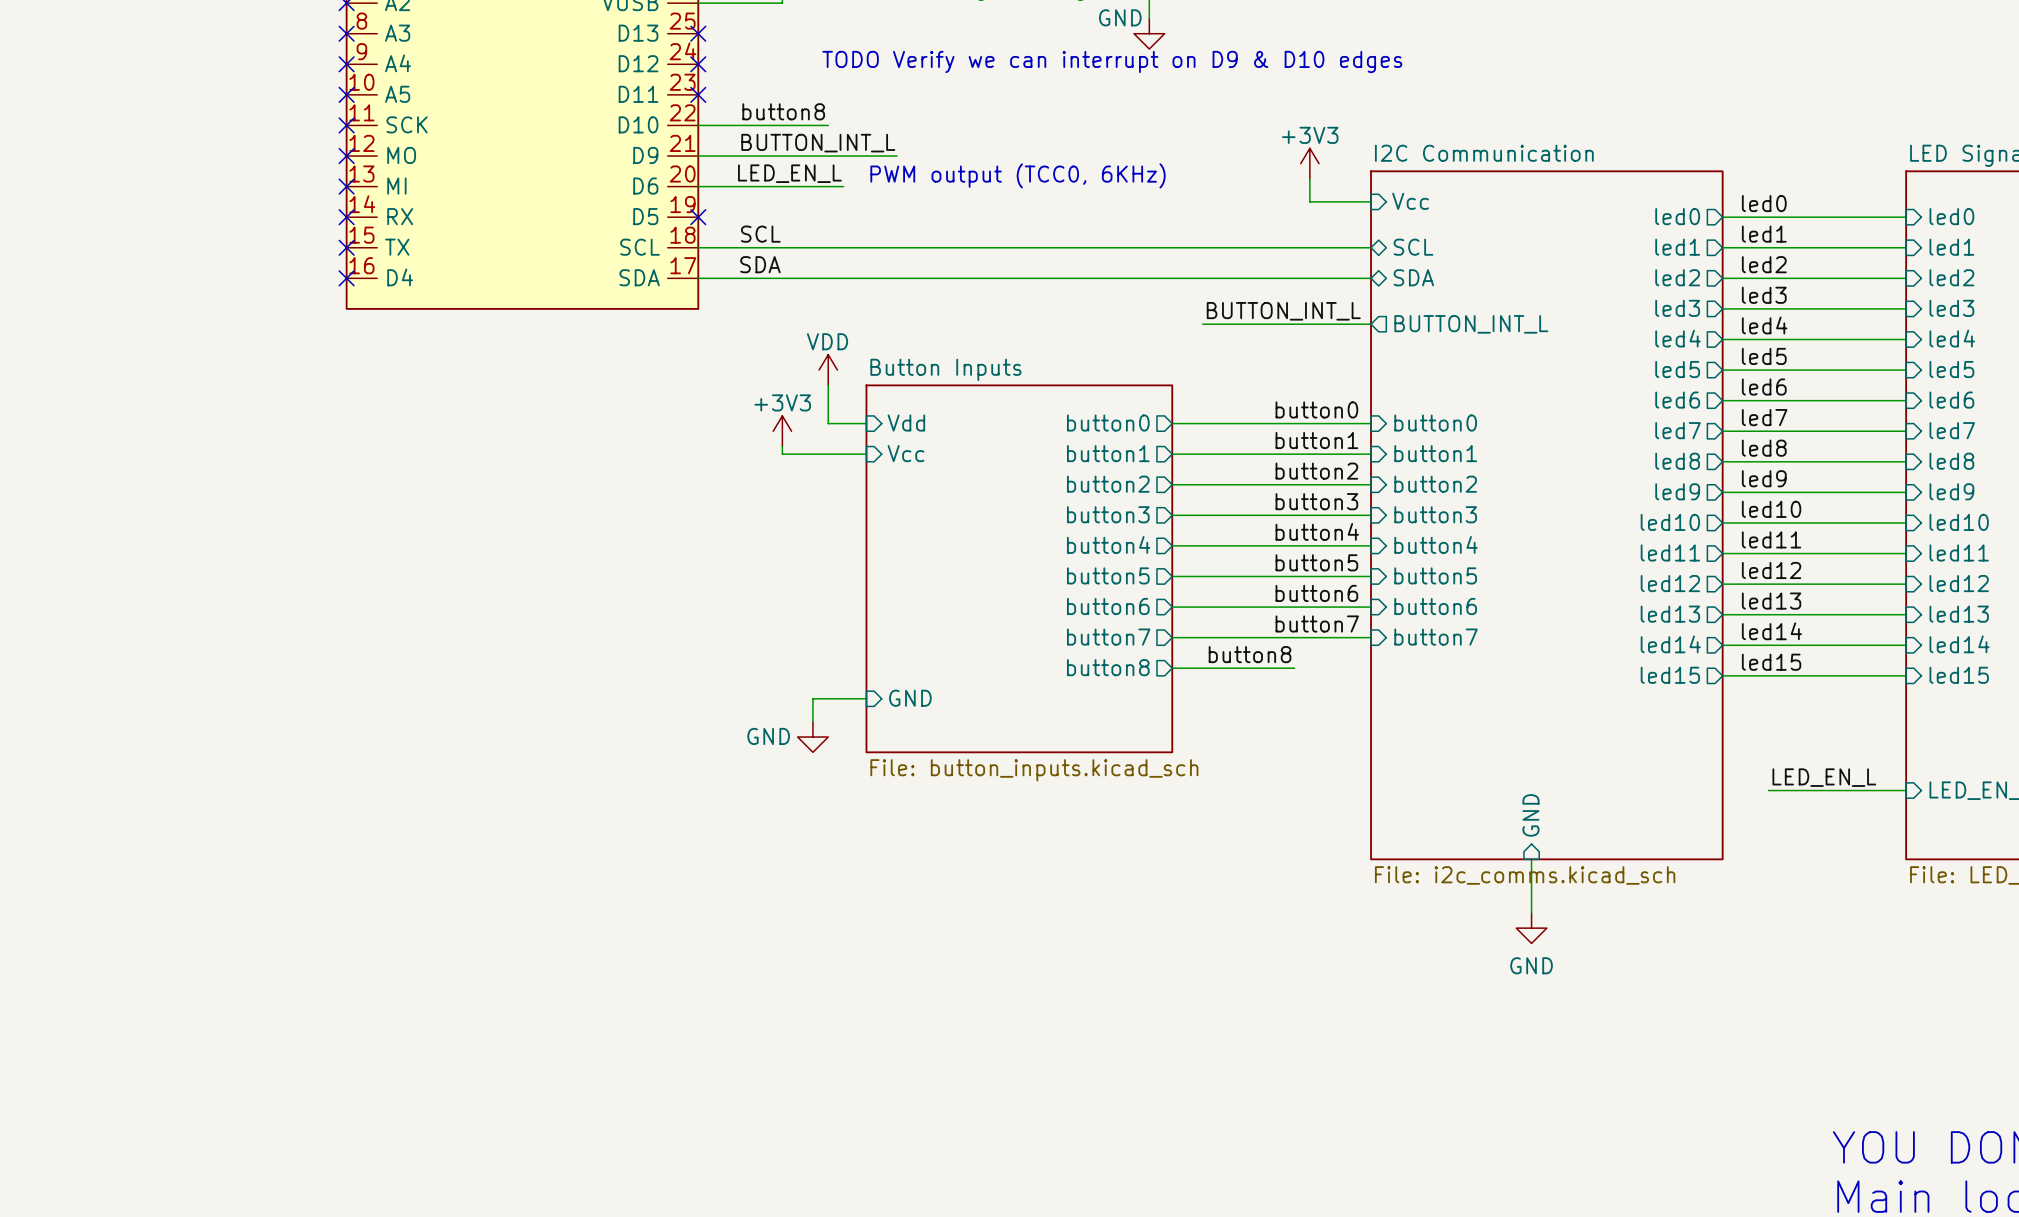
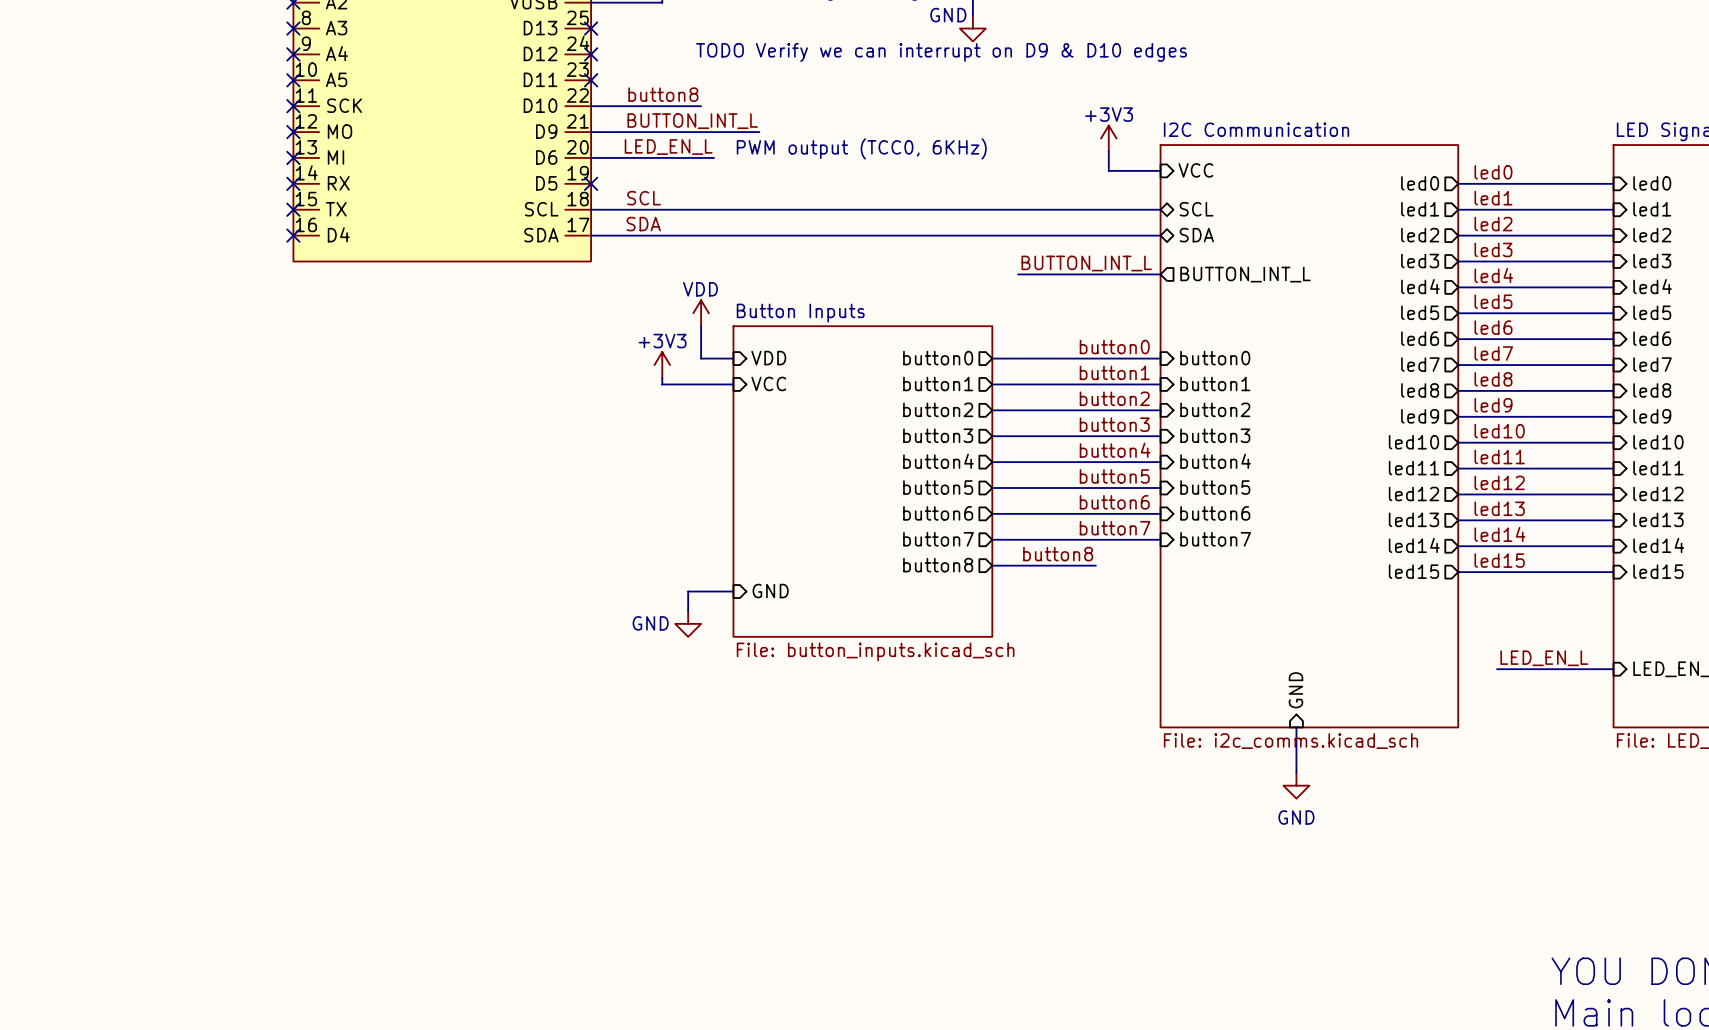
sheet pin: Vcc (1410, 201) -> VCC (1195, 170)
sheet pin: Vdd (906, 423) -> VDD (768, 358)
sheet pin: Vcc (906, 453) -> VCC (768, 383)

